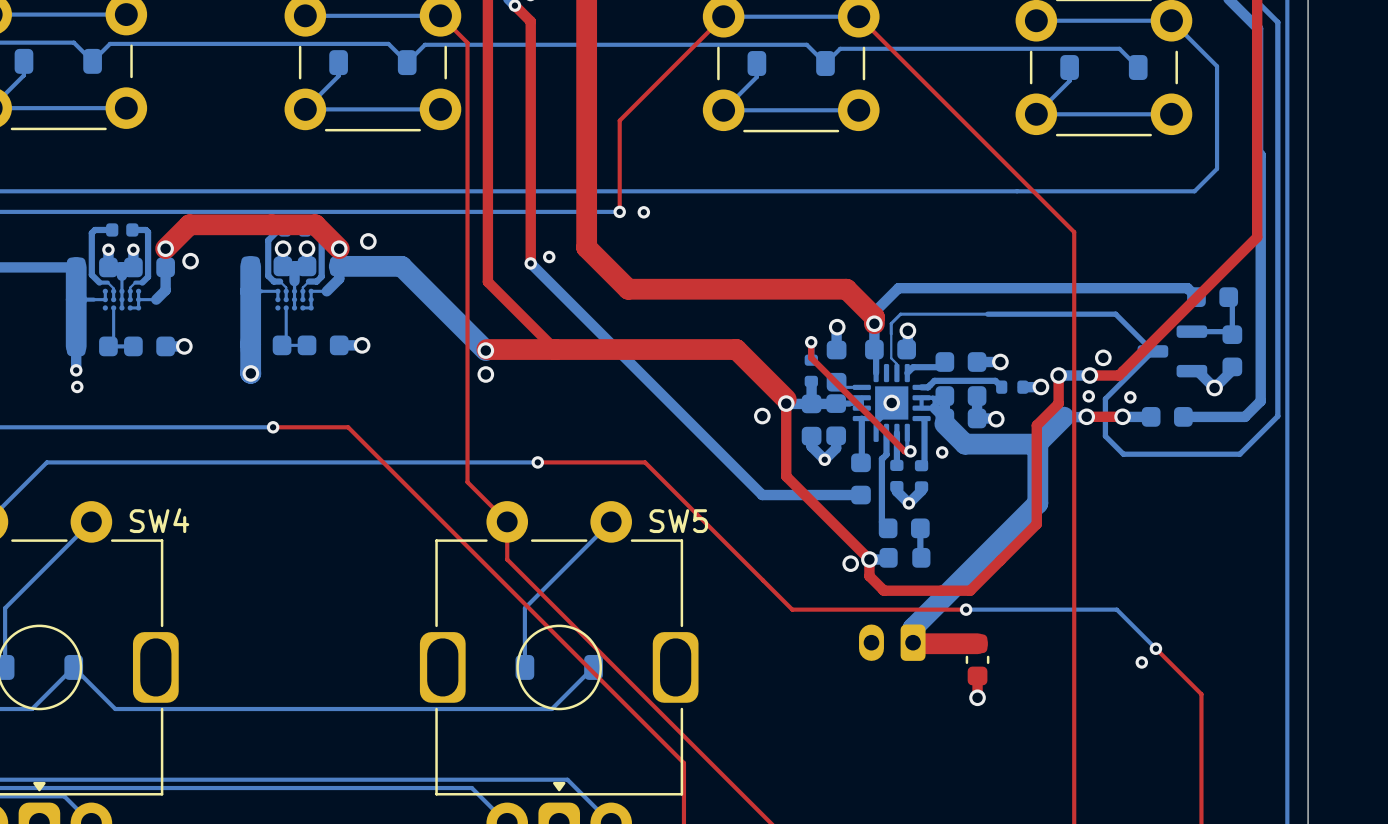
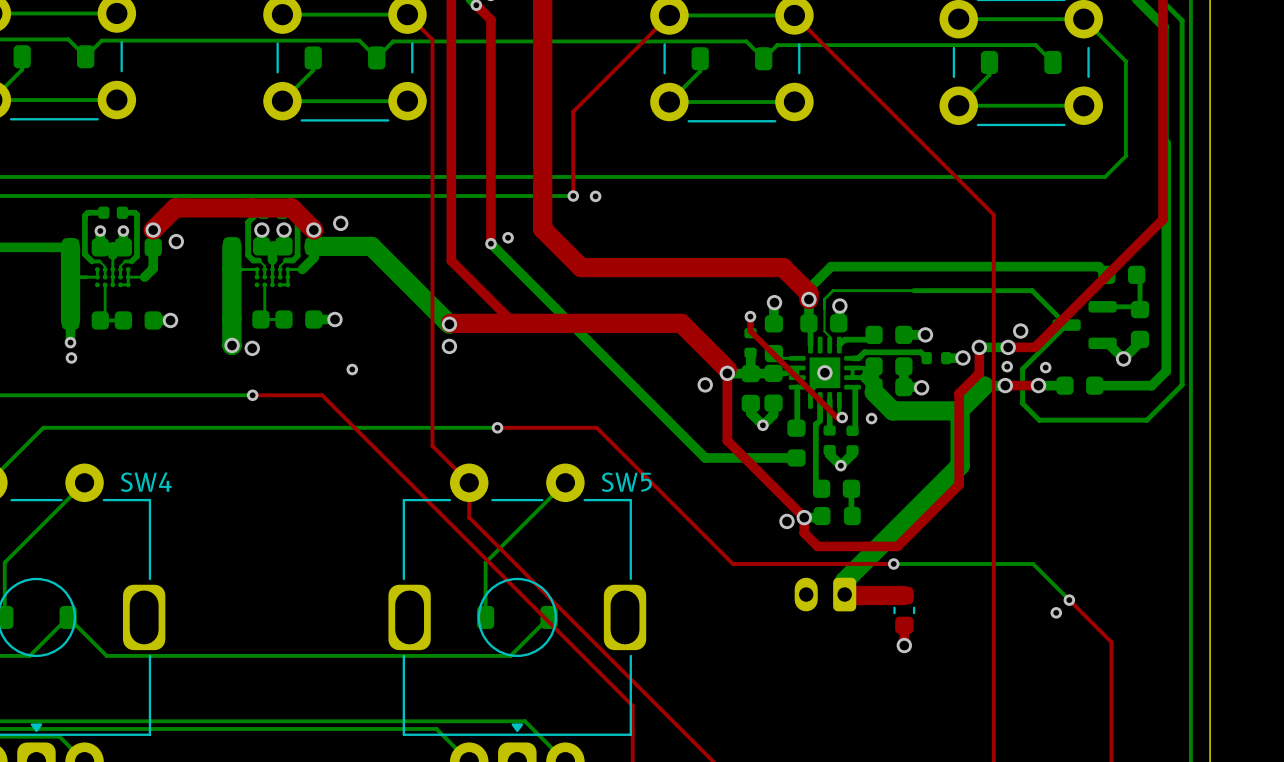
via: none -> (252, 348)
via: none -> (352, 369)

